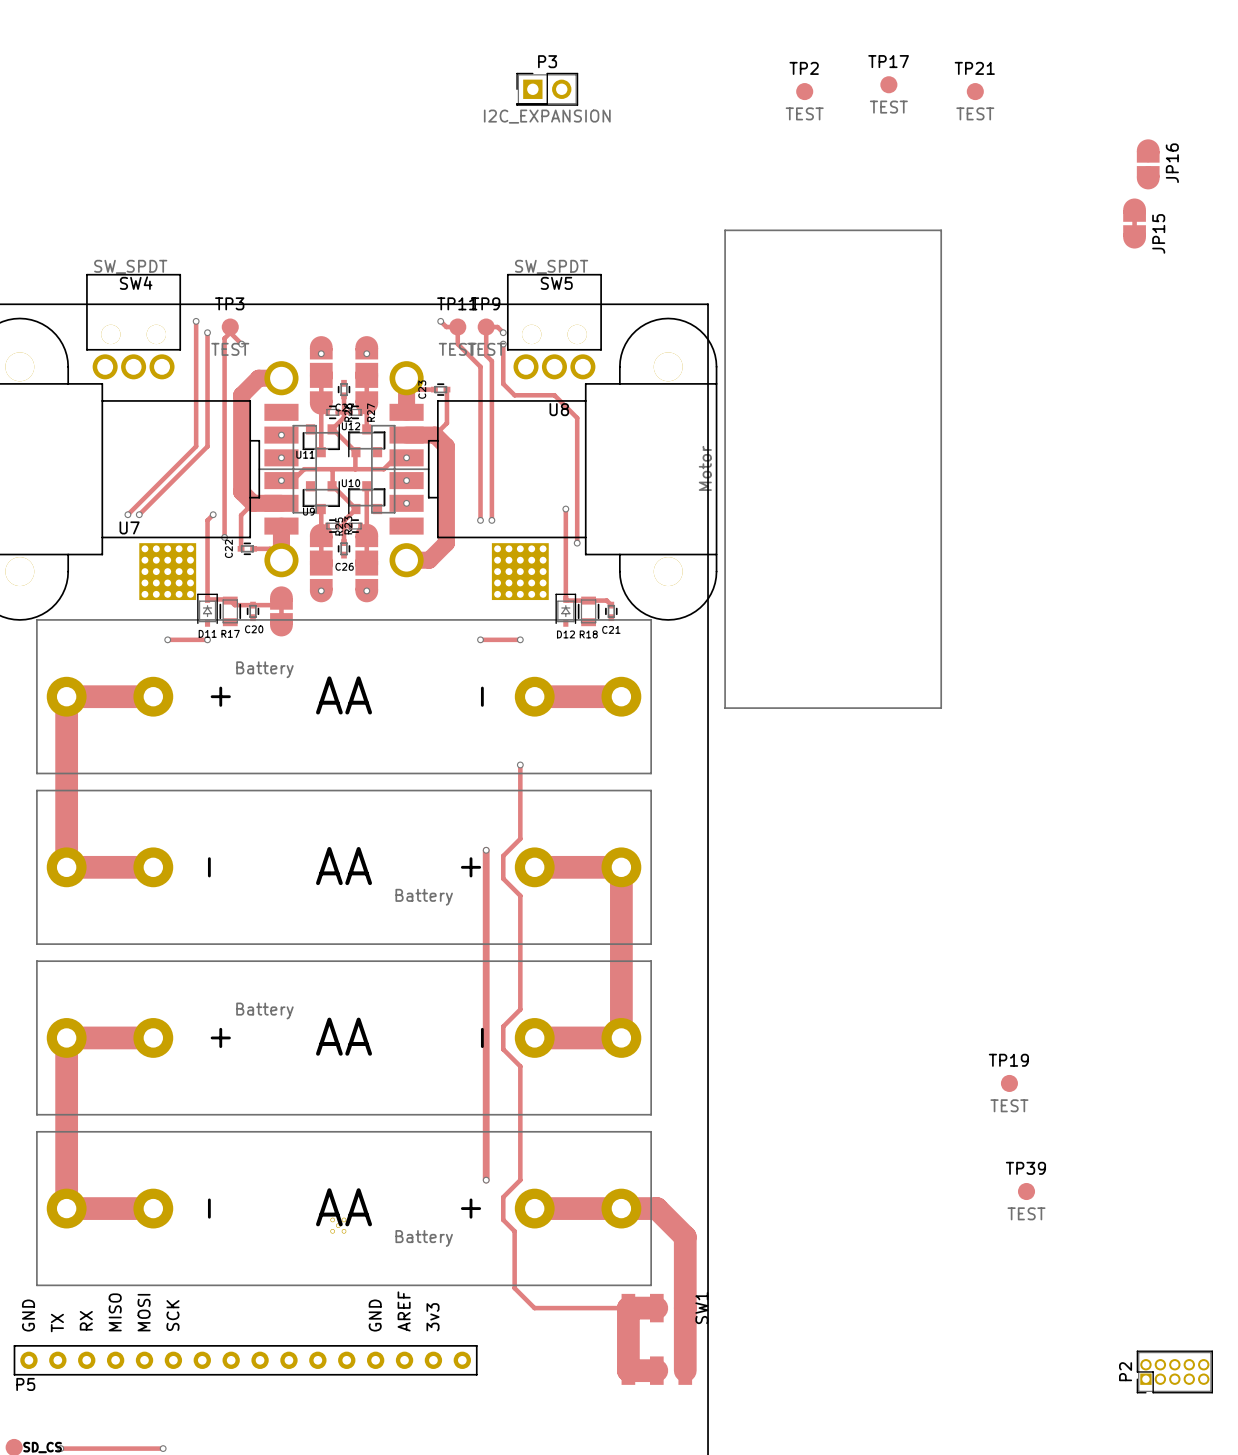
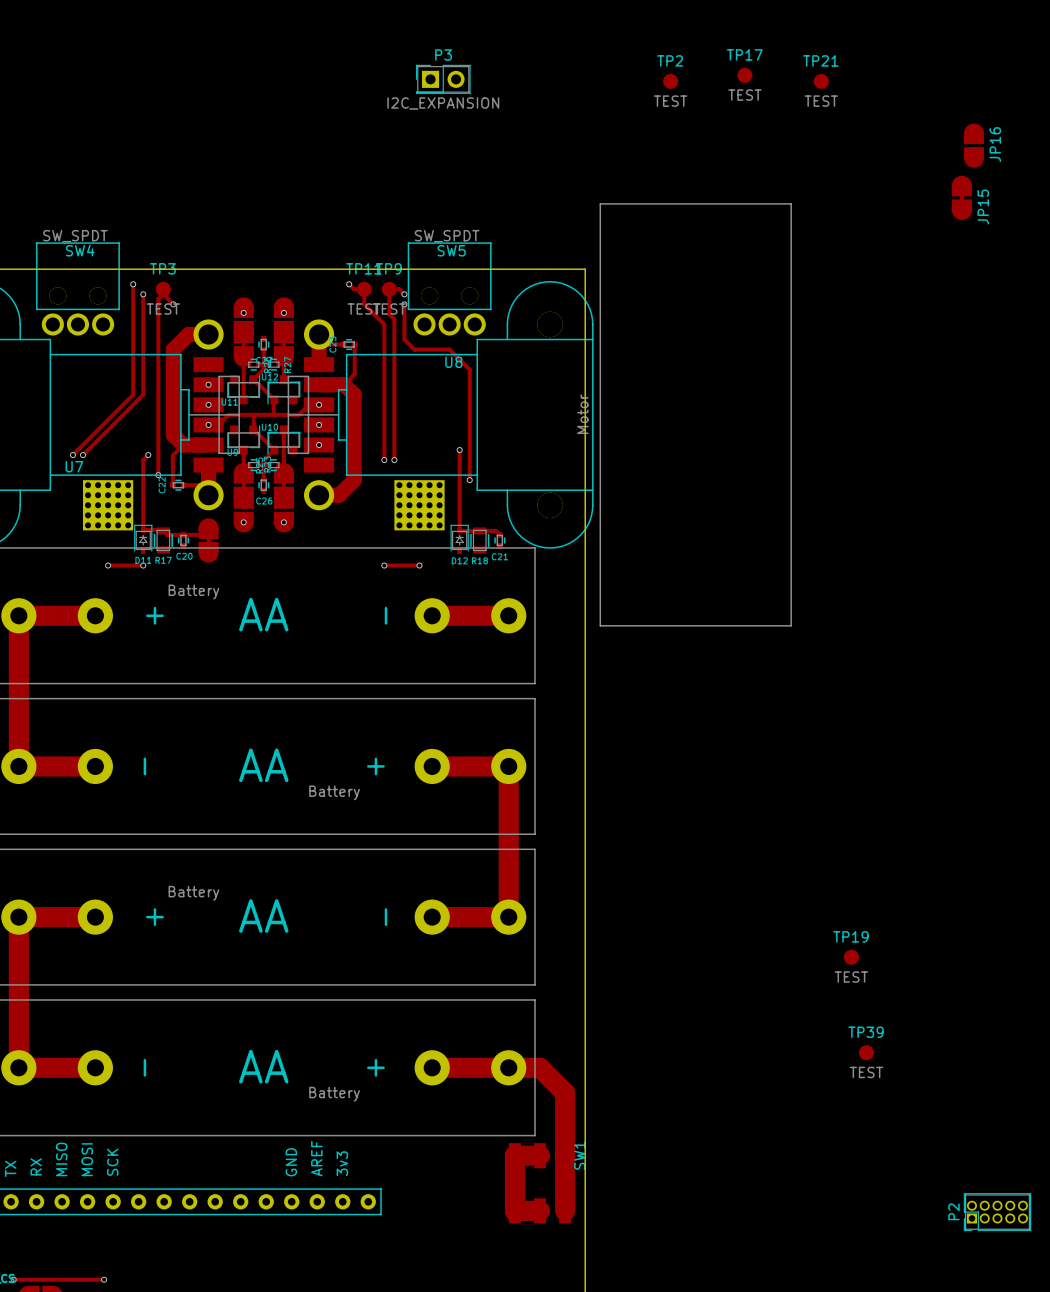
track: (520, 764) (520, 838) (503, 855) (503, 878) (520, 895) (520, 1009) (503, 1026) (503, 1049) (520, 1066) (520, 1180) (503, 1197) (503, 1219) (514, 1231) (514, 1288) (534, 1308) (628, 1308) -> none
via: (520, 764) -> none
track: (486, 850) (486, 1180) -> none
via: (486, 850) -> none
via: (486, 1180) -> none
part: (338, 1225) -> none

